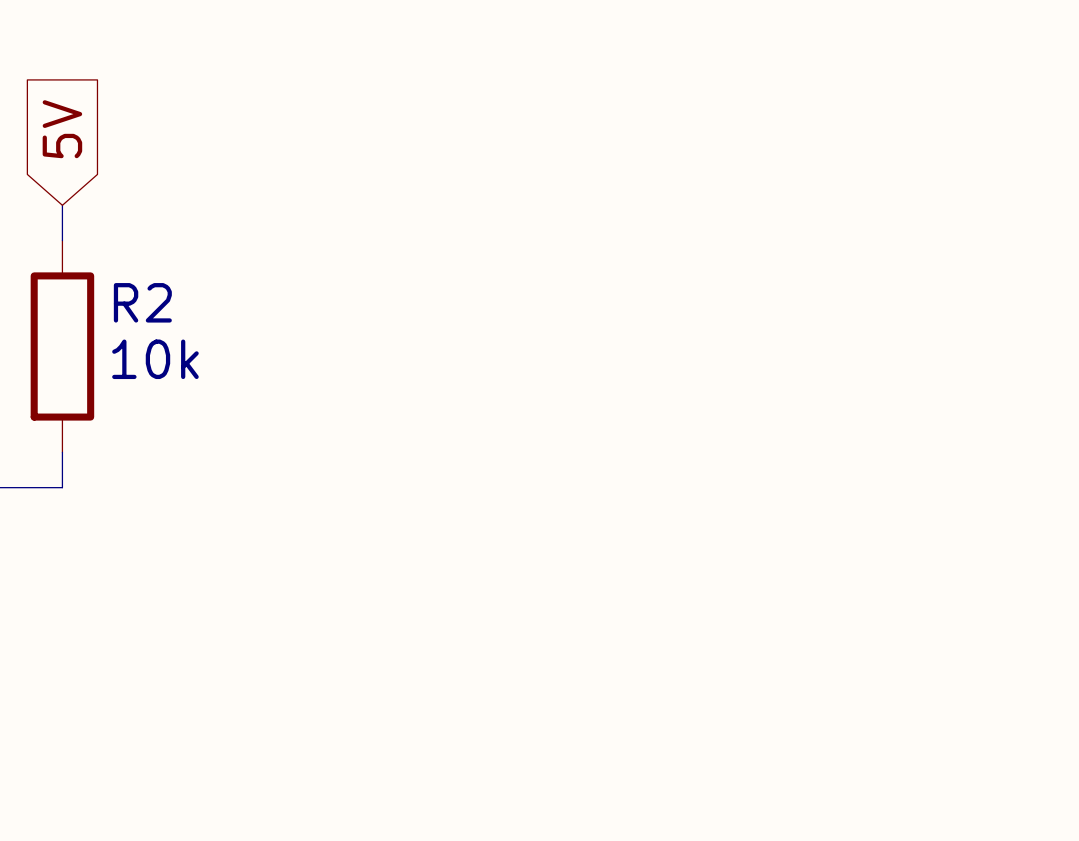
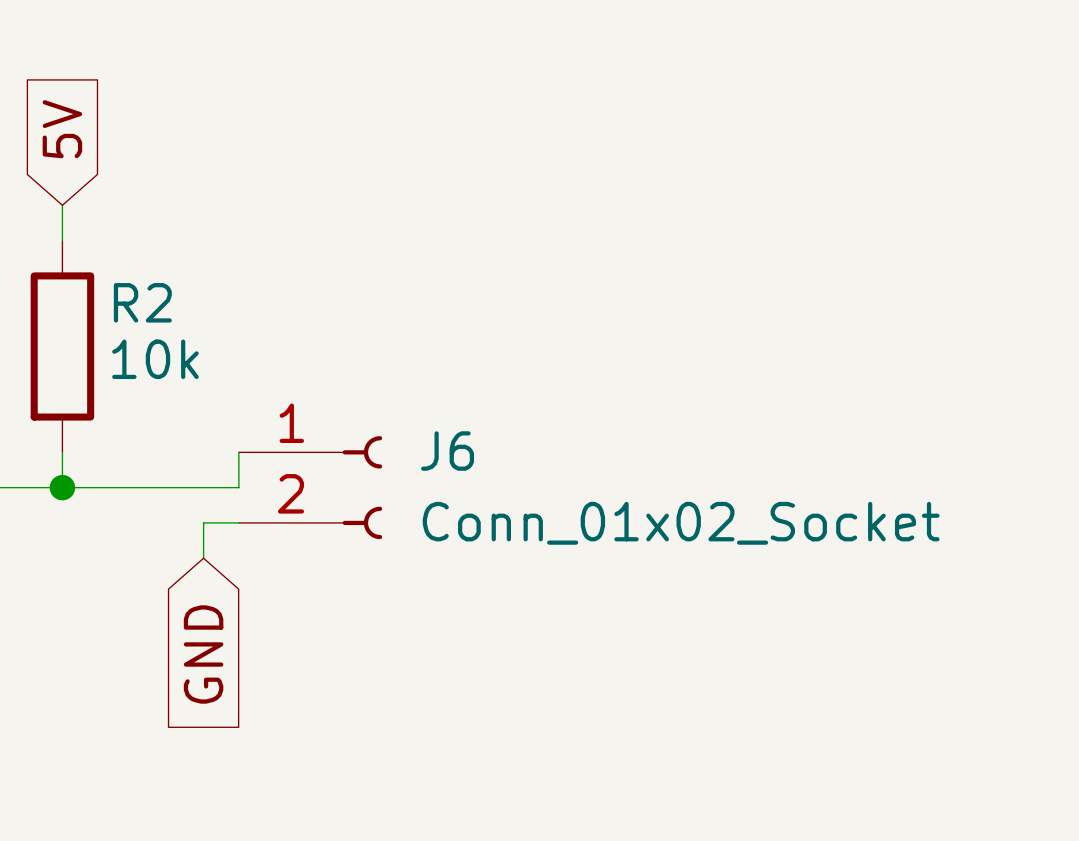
wire: none -> (238, 452) (238, 487) (62, 487)
junction: none -> (62, 487)
J6: none -> Conn_01x02_Socket (310, 487)
wire: none -> (238, 522) (203, 522) (203, 558)
global label: none -> GND (203, 654)

